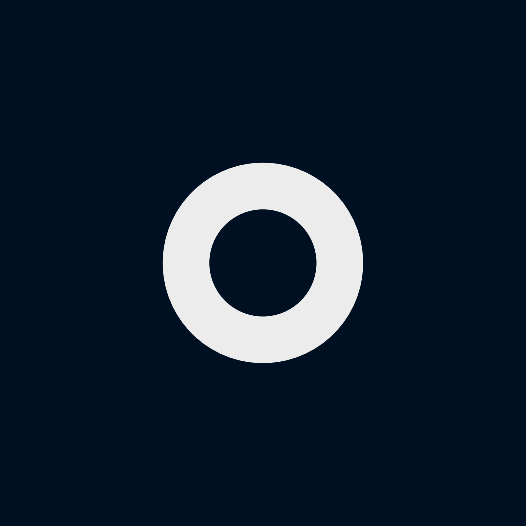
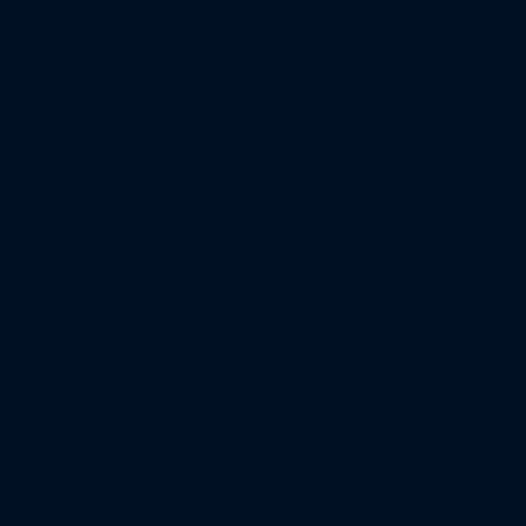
via: (262, 262) -> none

